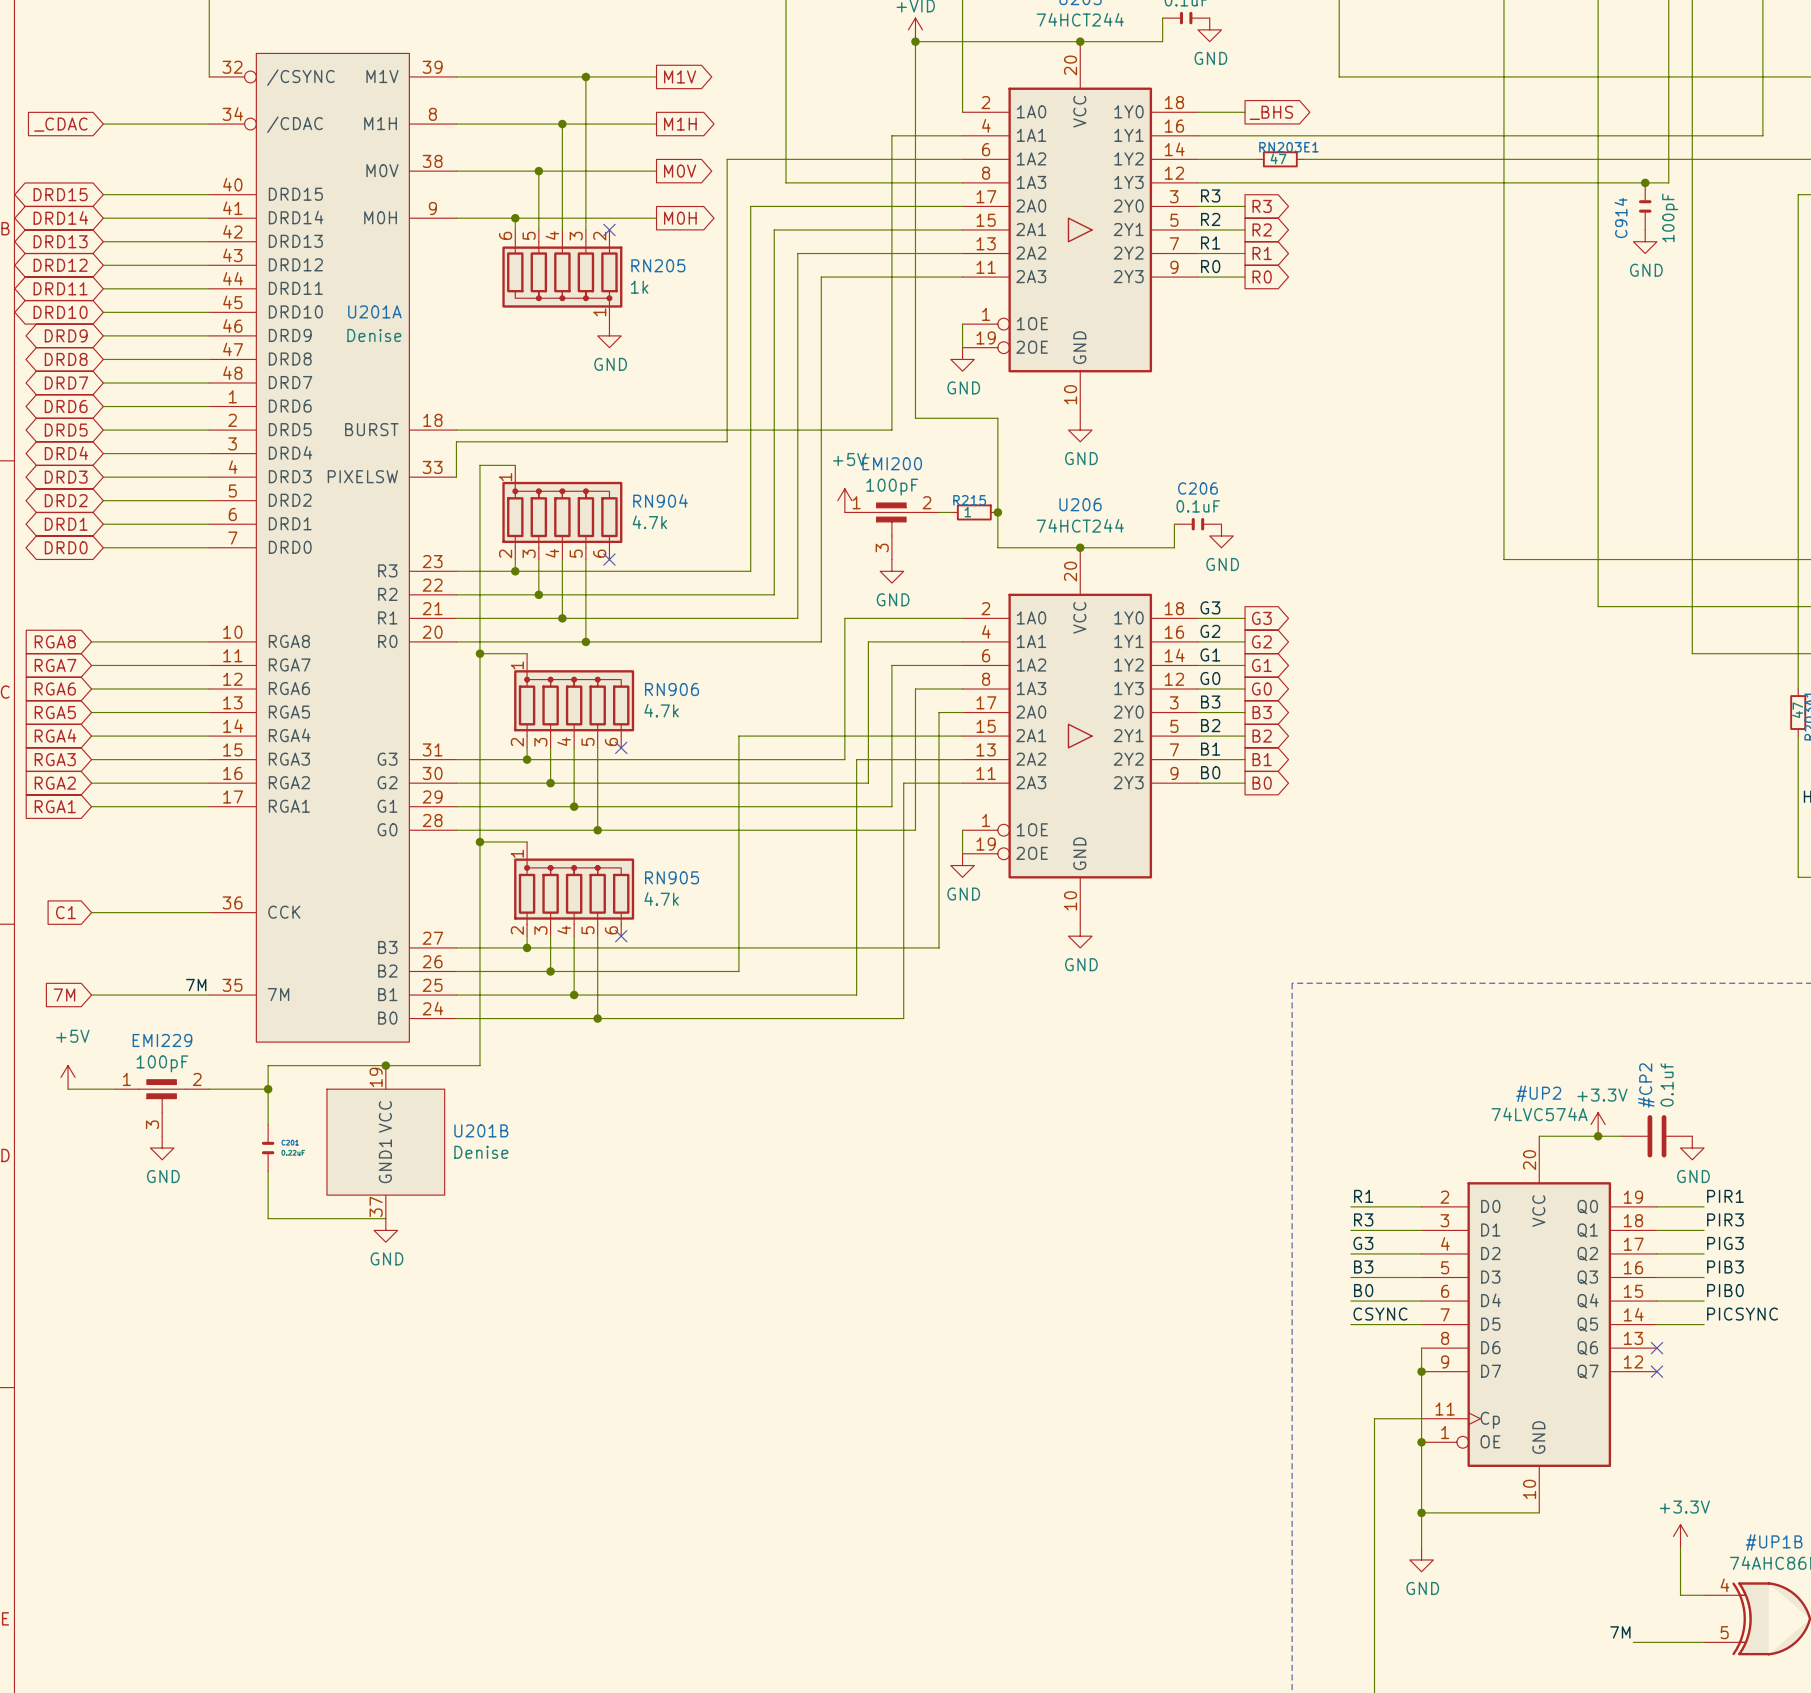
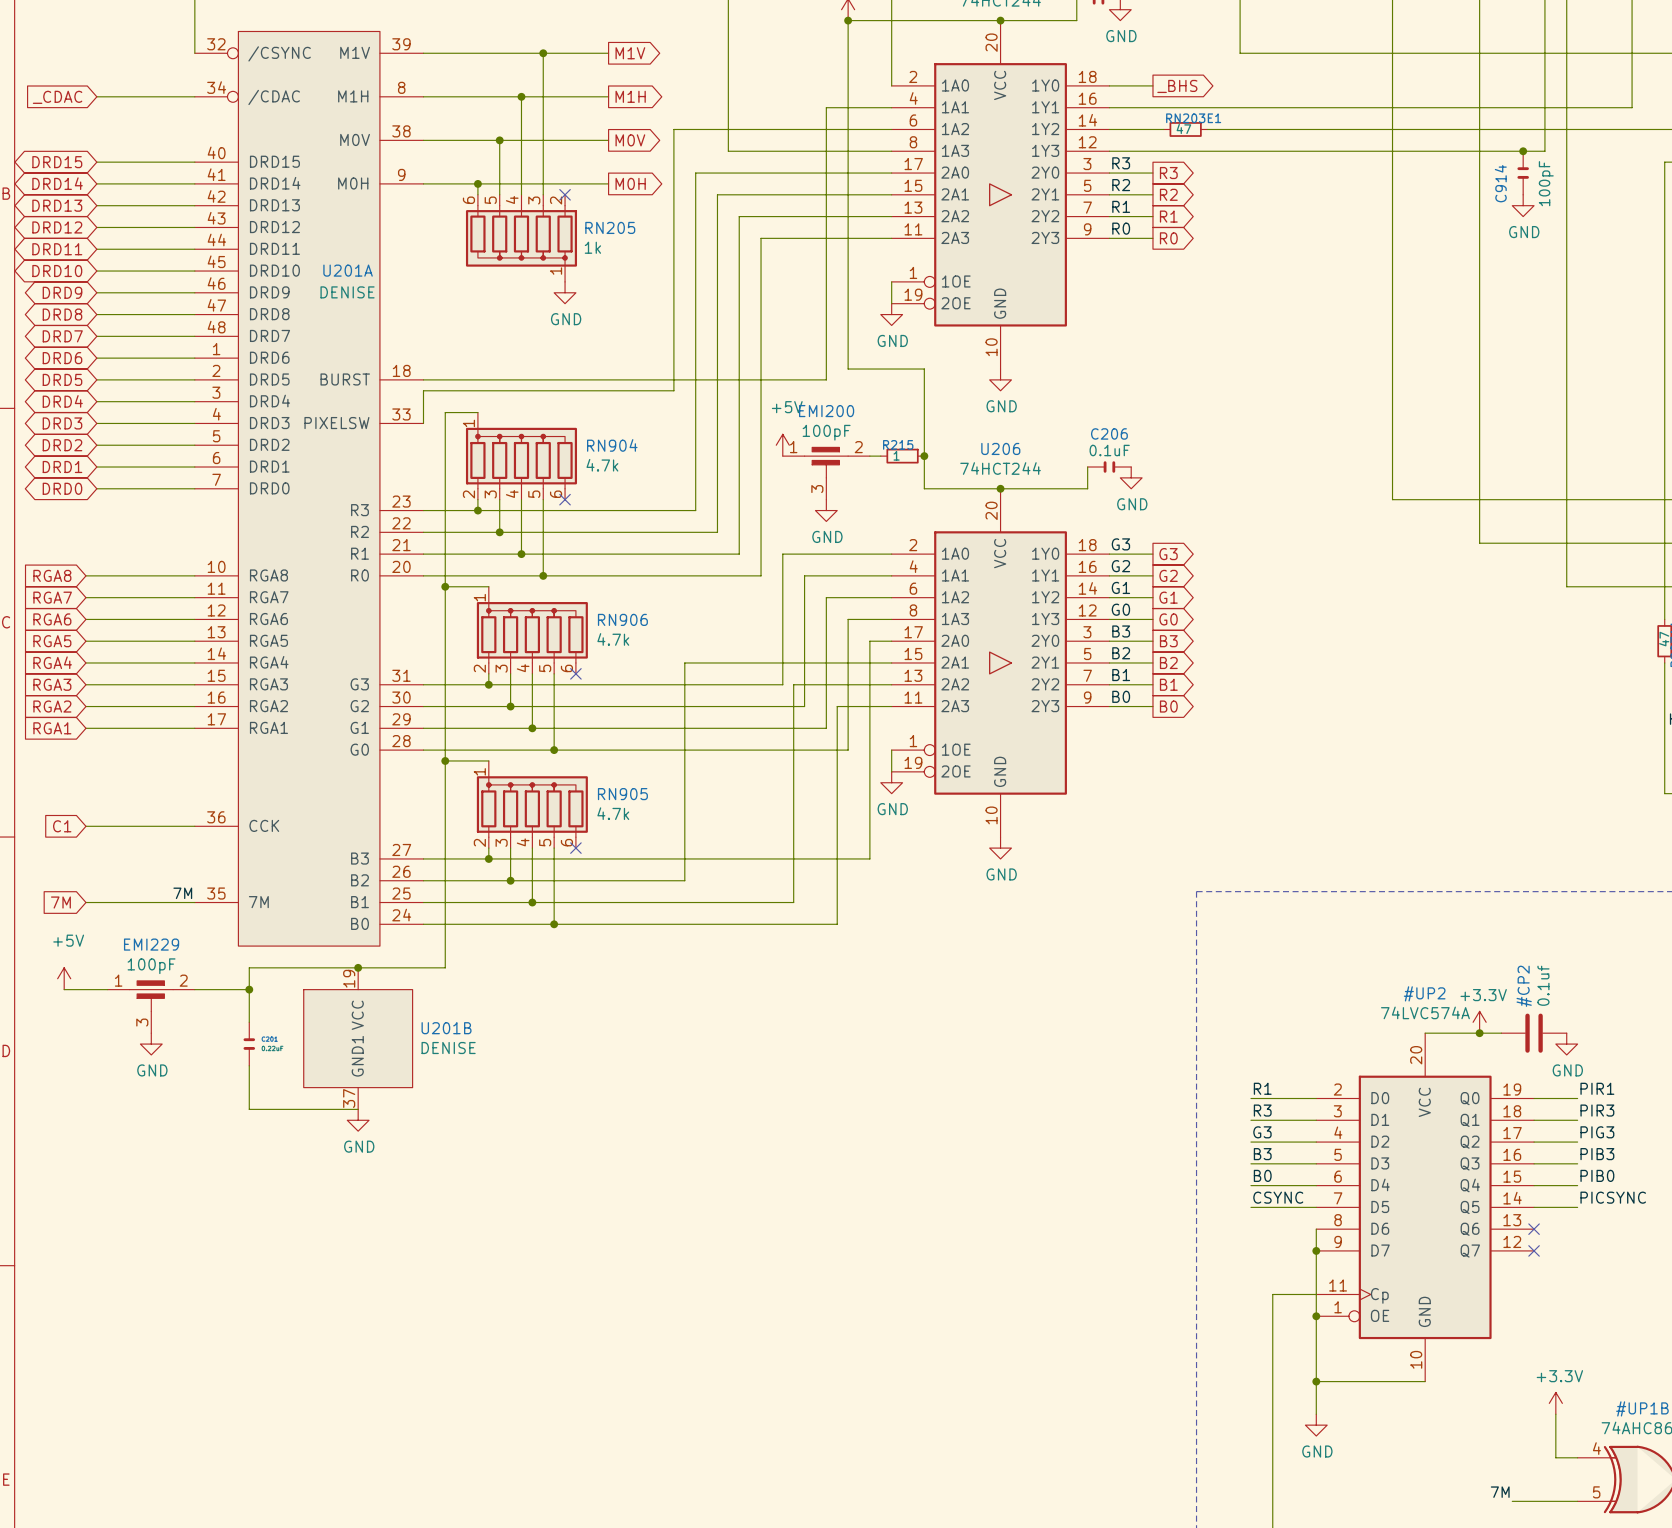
U201A value: Denise (374, 335) -> DENISE (347, 292)
U201B value: Denise (481, 1152) -> DENISE (448, 1048)

